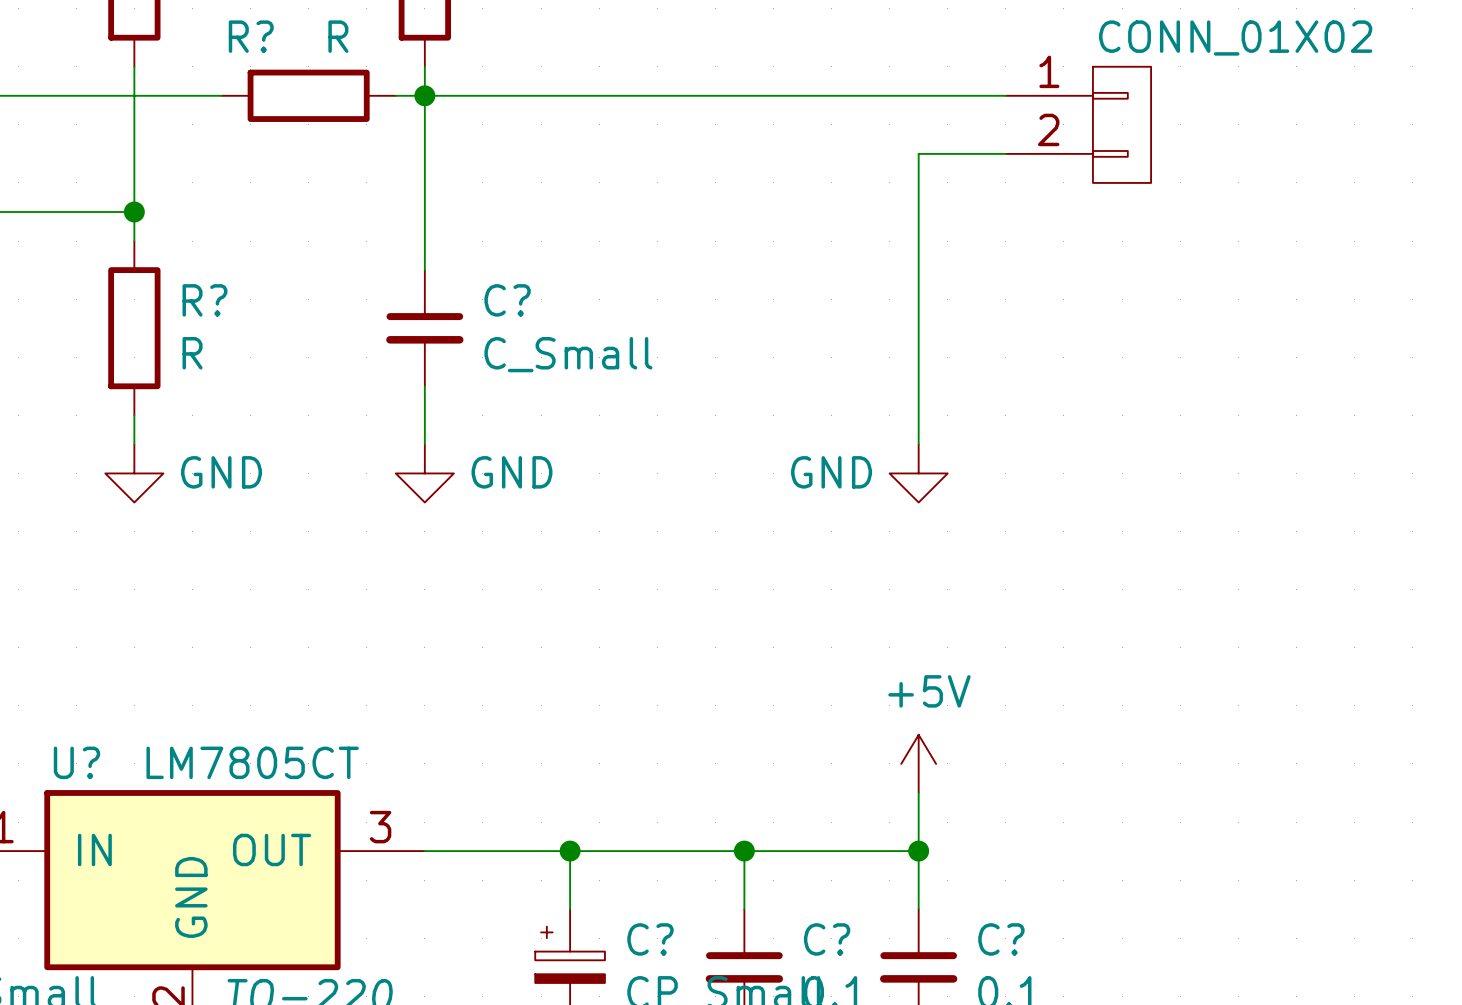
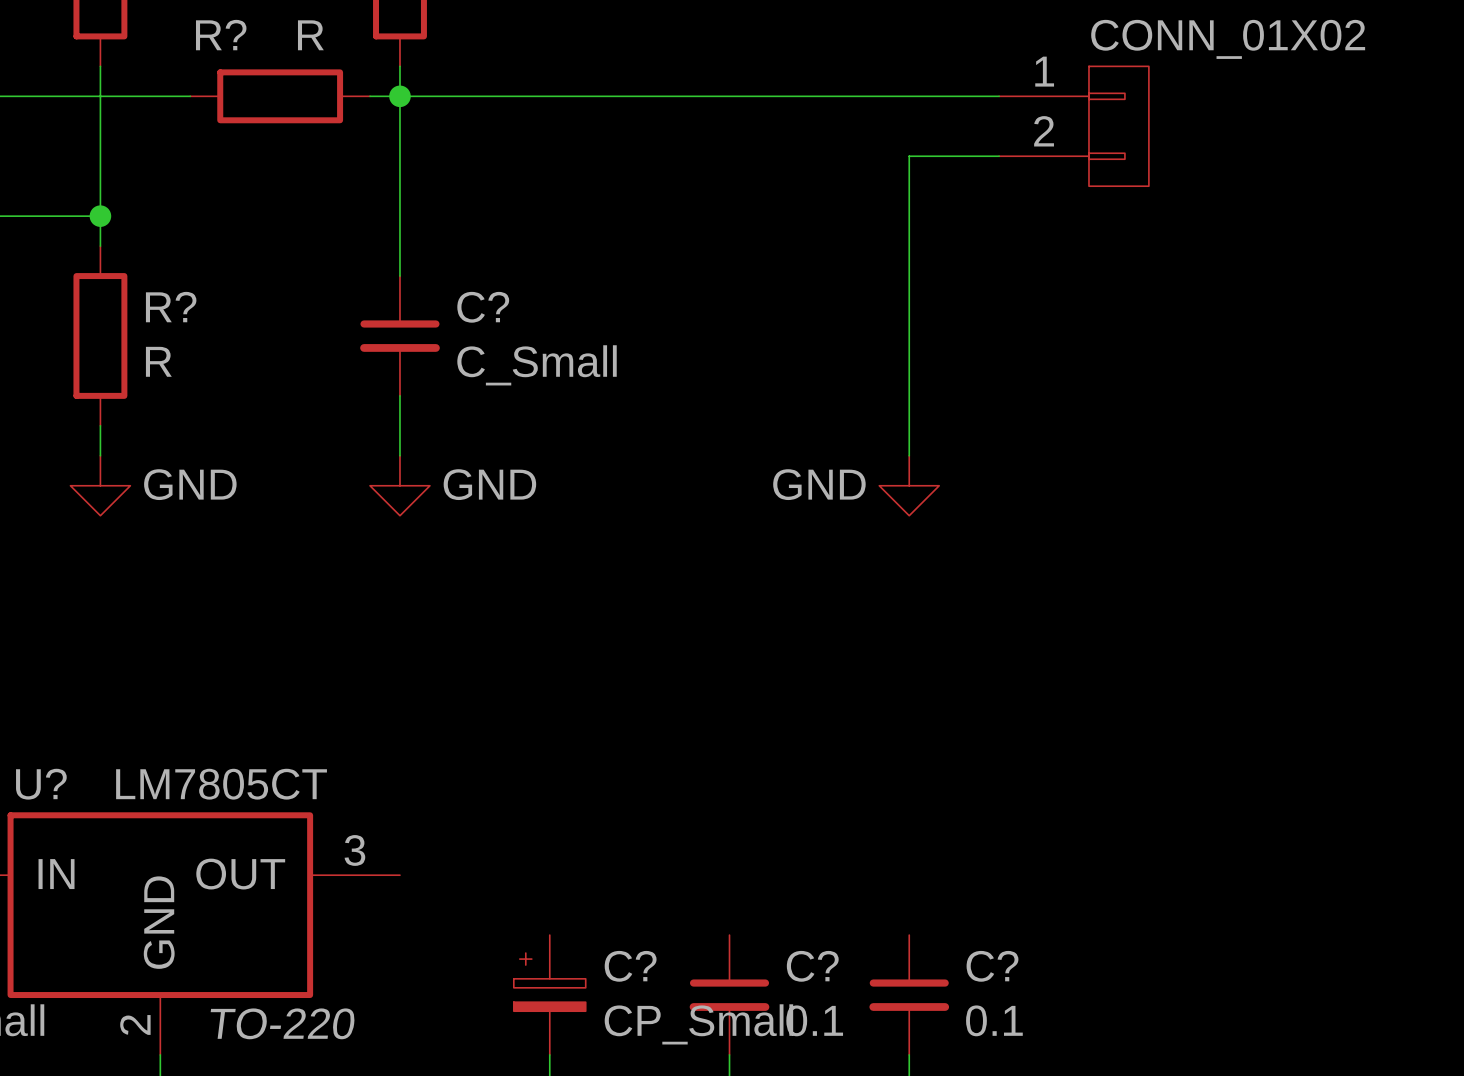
power symbol: +5V (918, 763) -> none
wire: (918, 792) (918, 909) -> none
wire: (424, 851) (918, 851) -> none
wire: (570, 851) (570, 909) -> none
junction: (570, 851) -> none
wire: (744, 851) (744, 909) -> none
junction: (744, 851) -> none
junction: (918, 851) -> none

